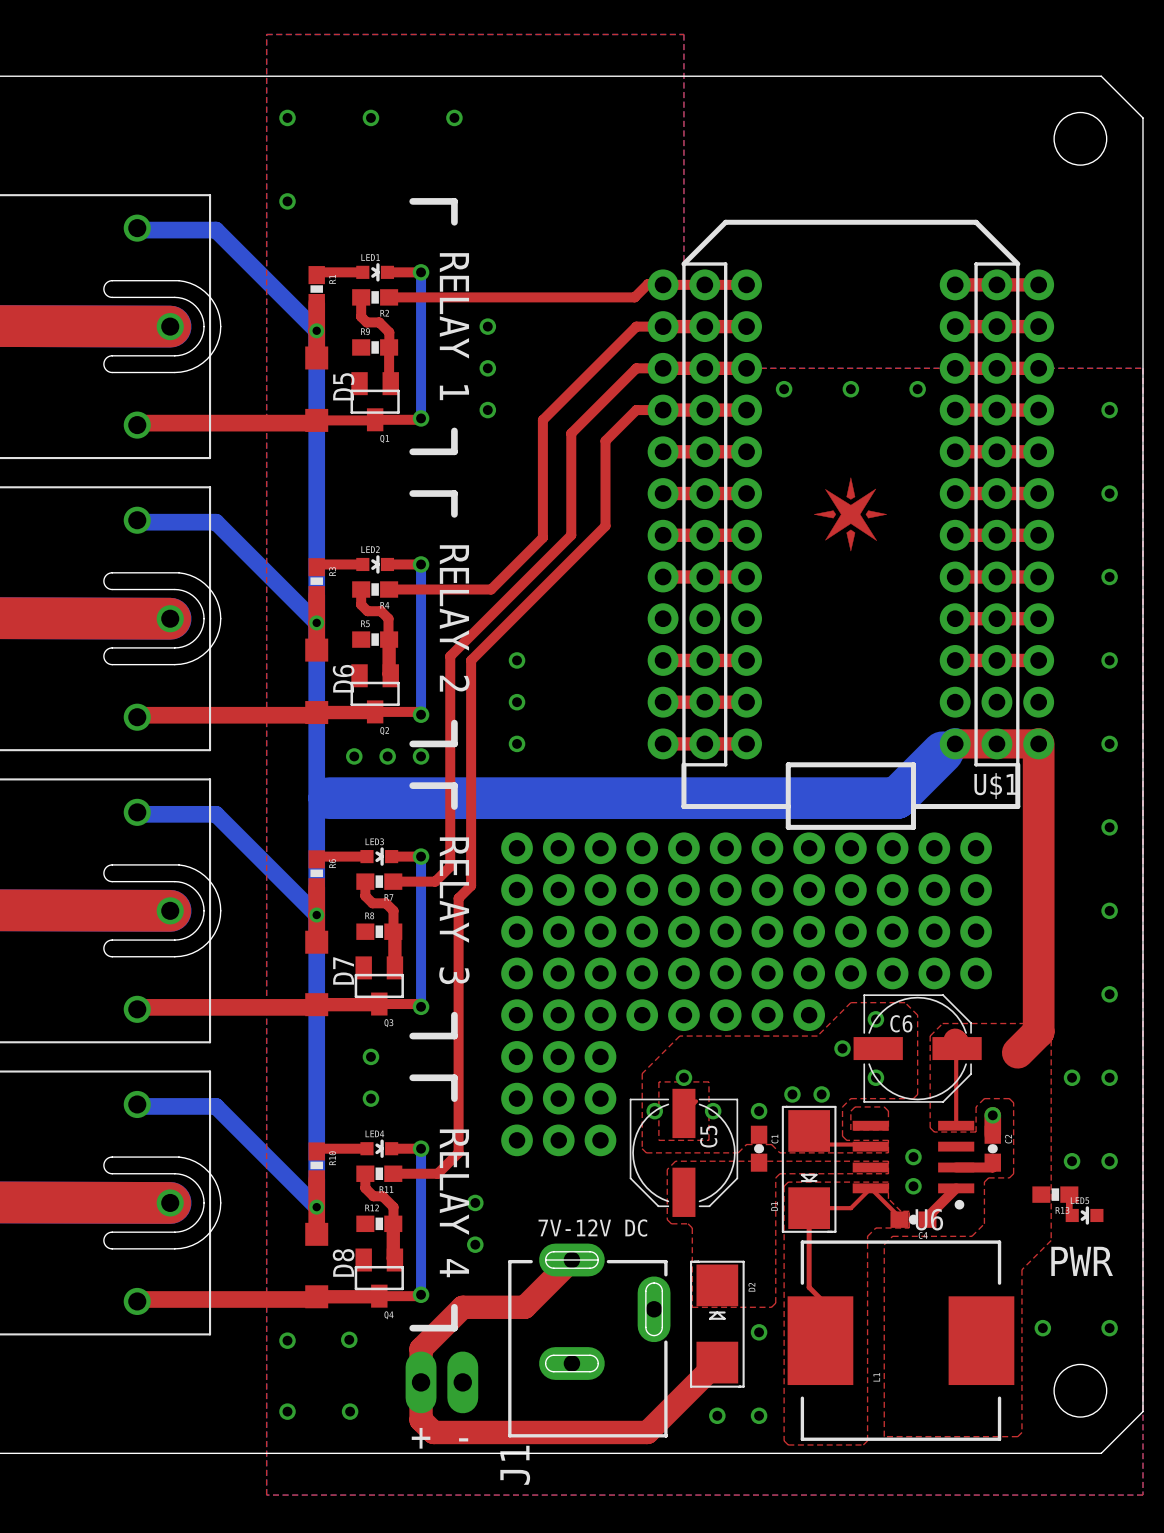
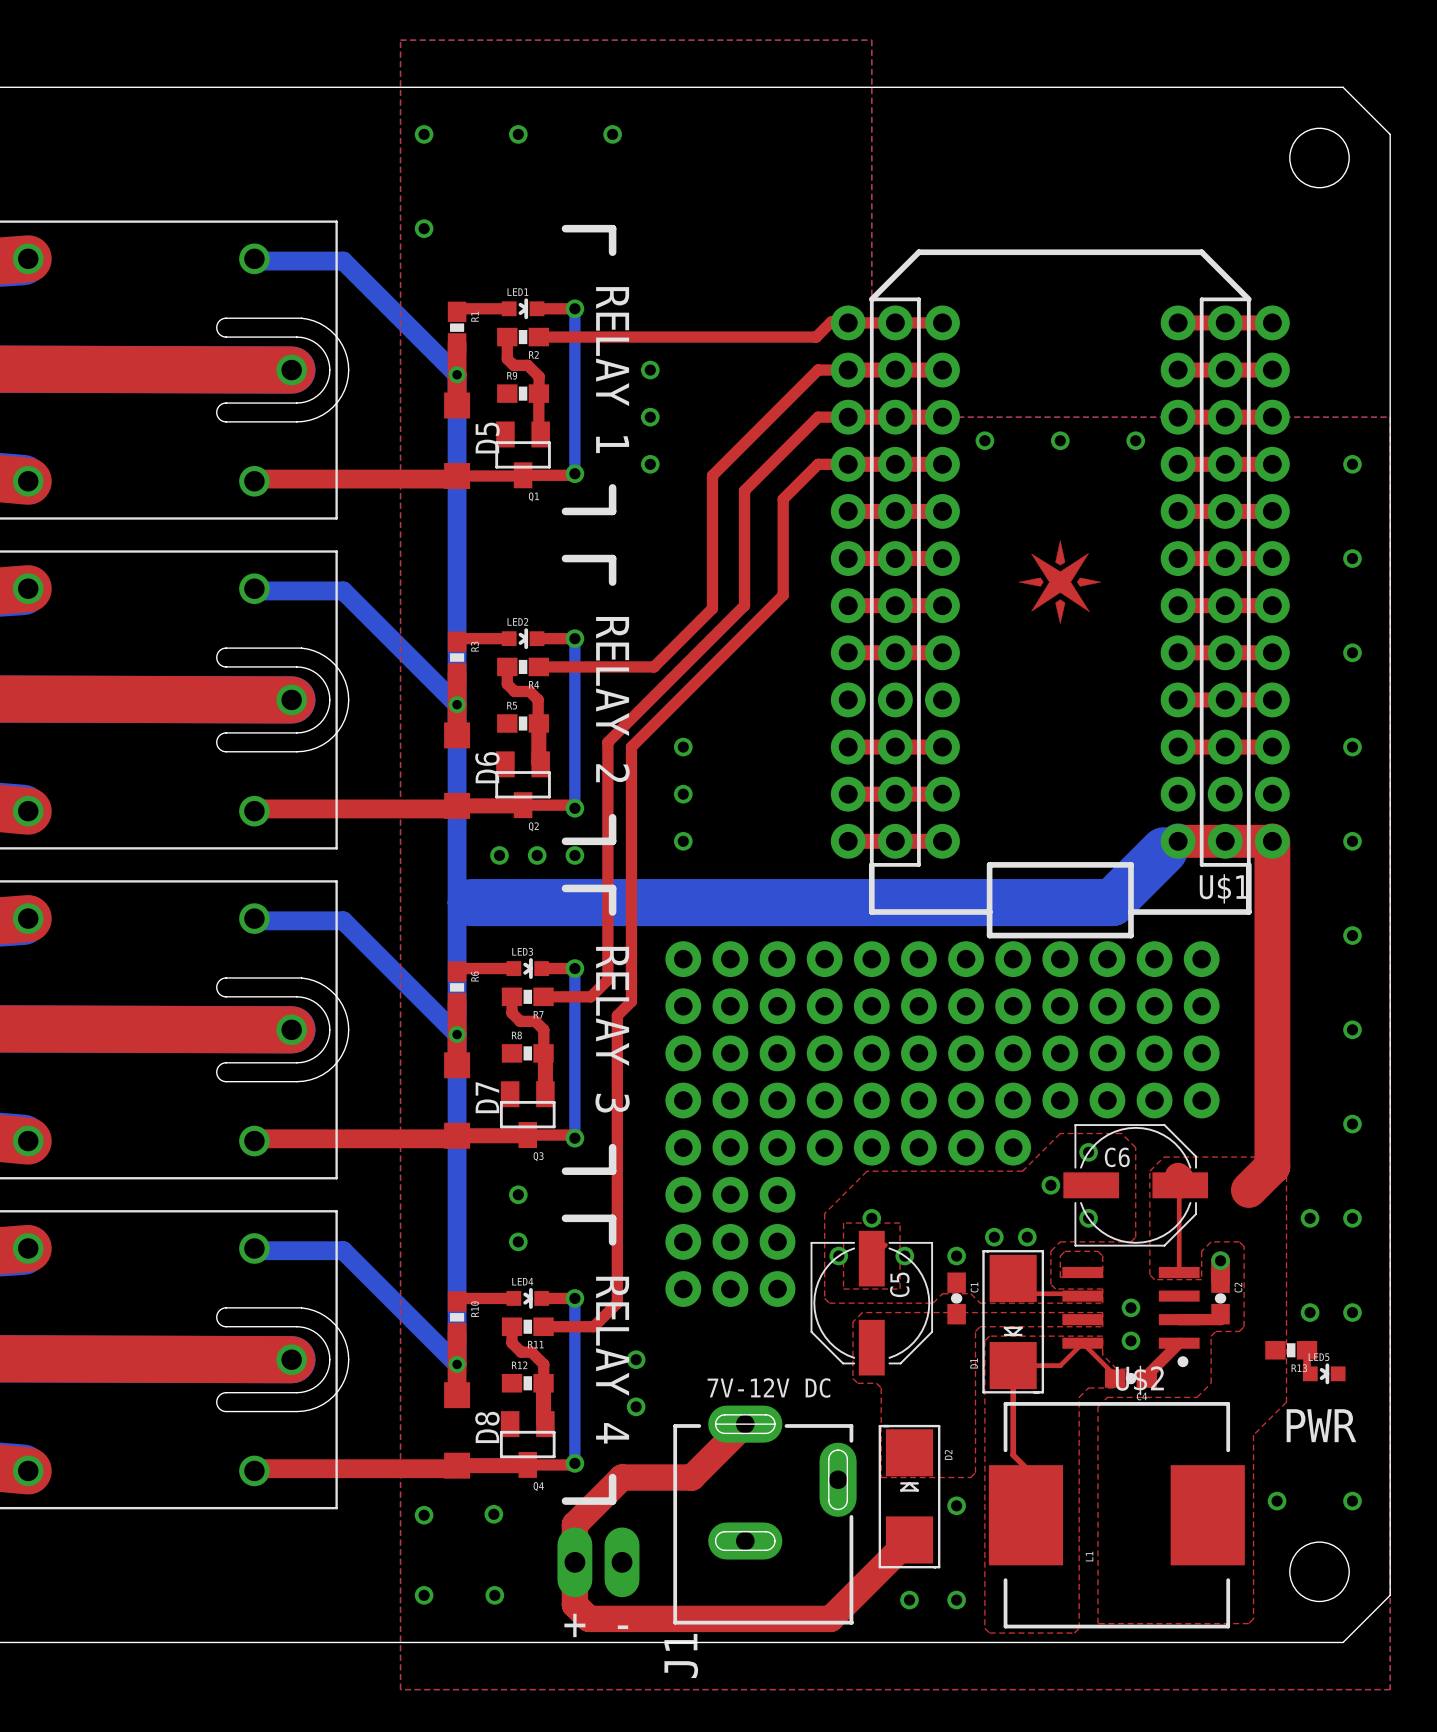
U6 name: U6 (929, 1219) -> U$2 (1139, 1380)

